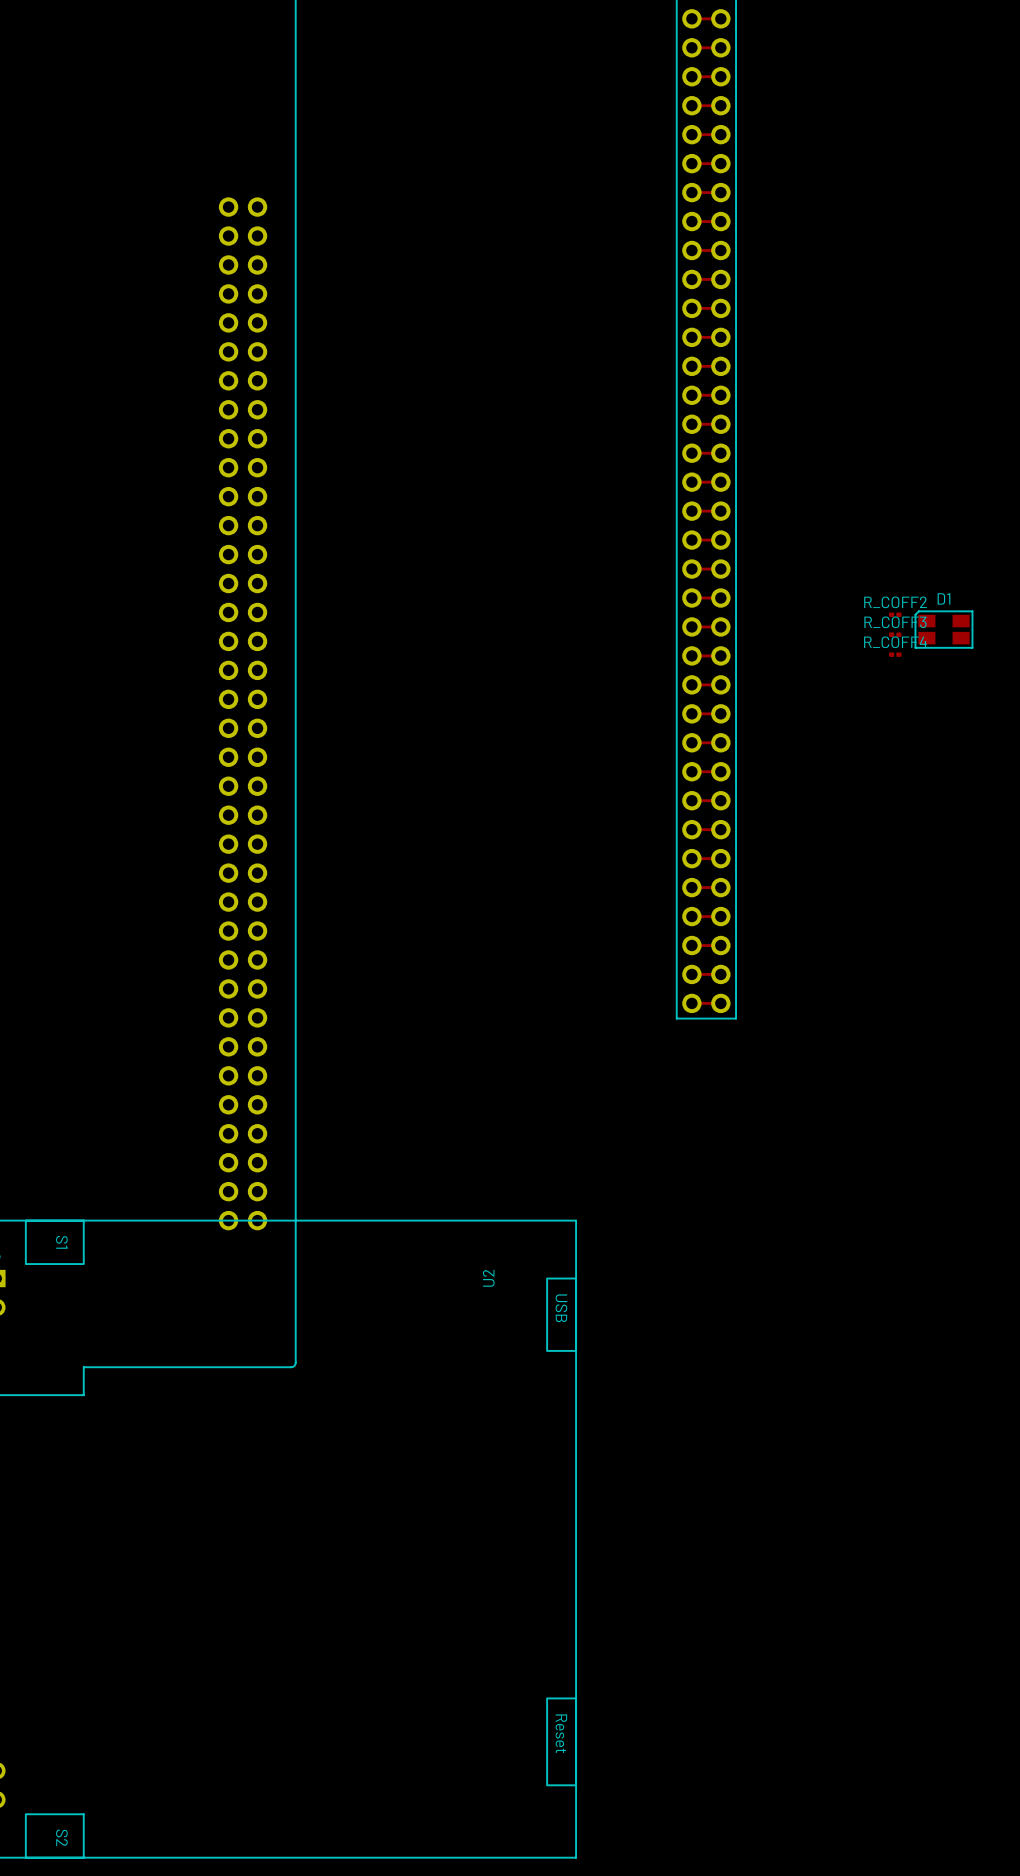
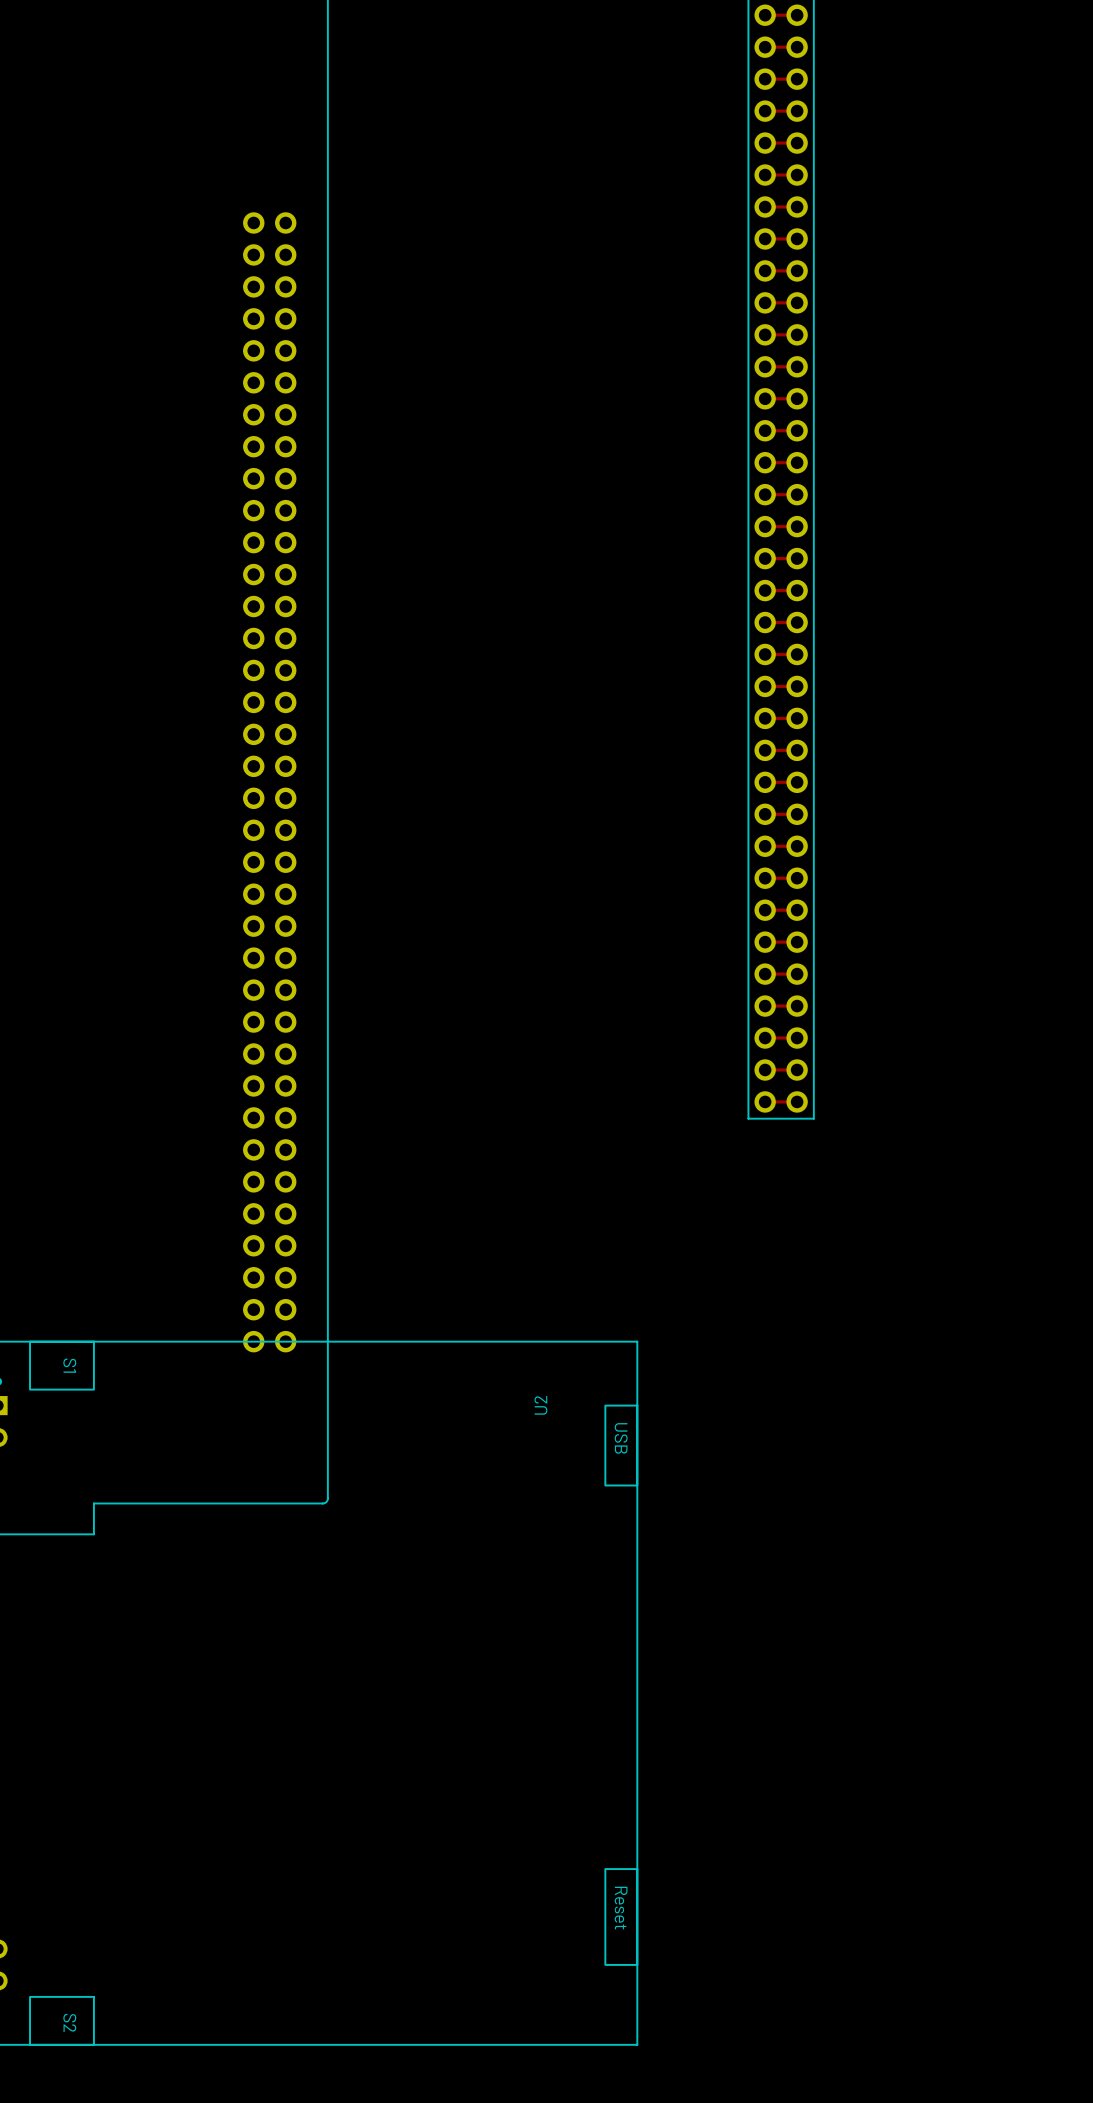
R_COFF2: (895, 614) -> none
D1: (943, 629) -> none
R_COFF3: (895, 634) -> none
R_COFF4: (895, 654) -> none

